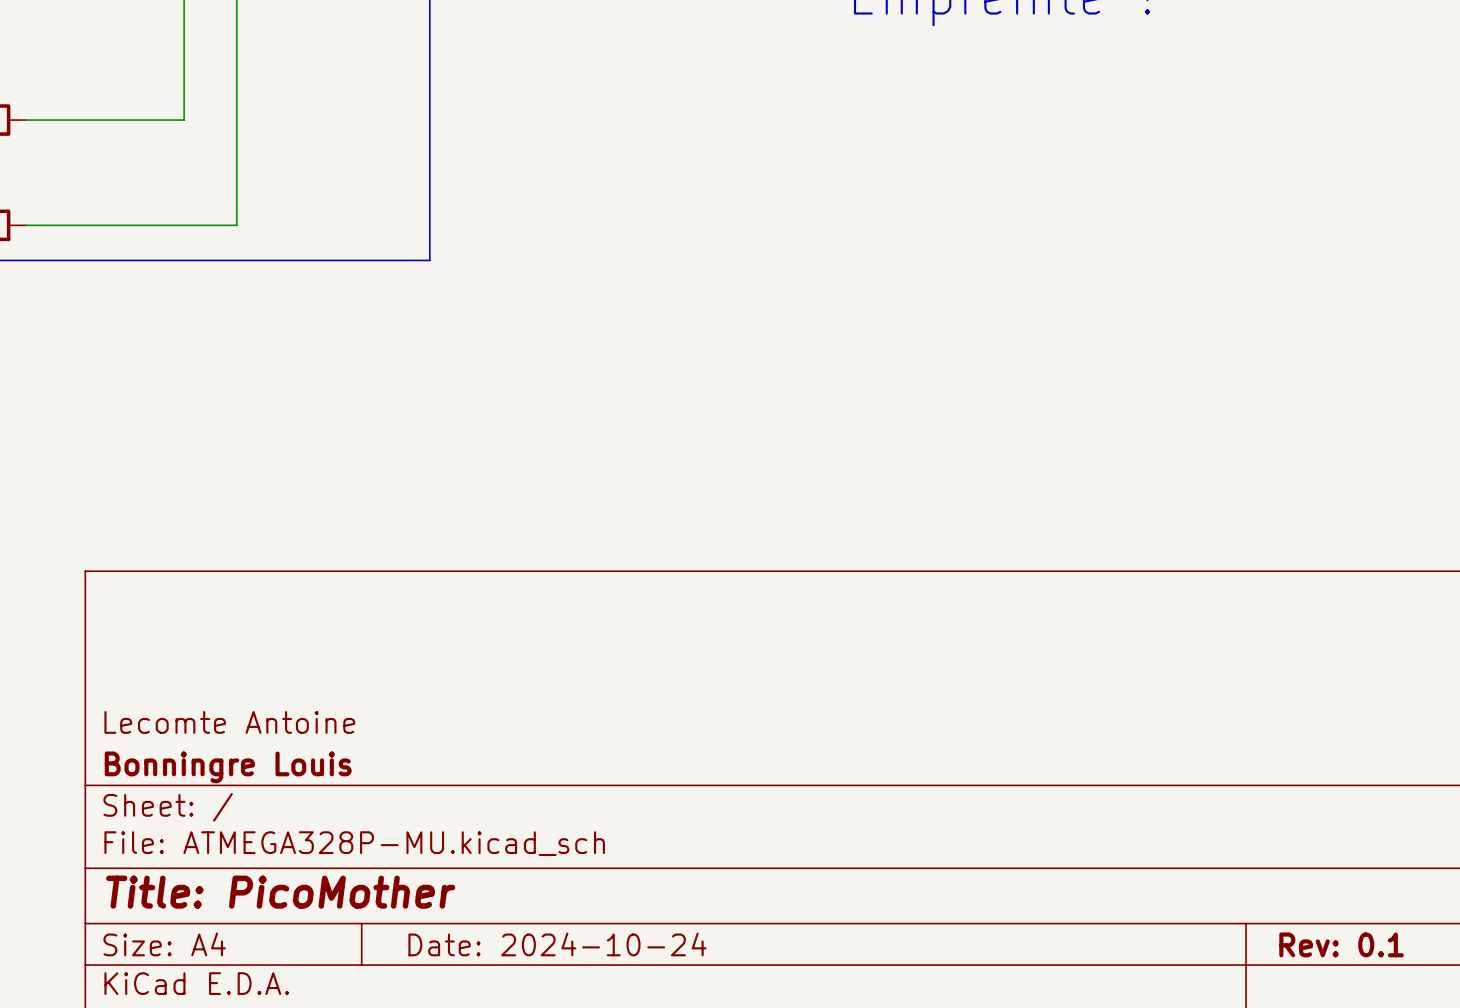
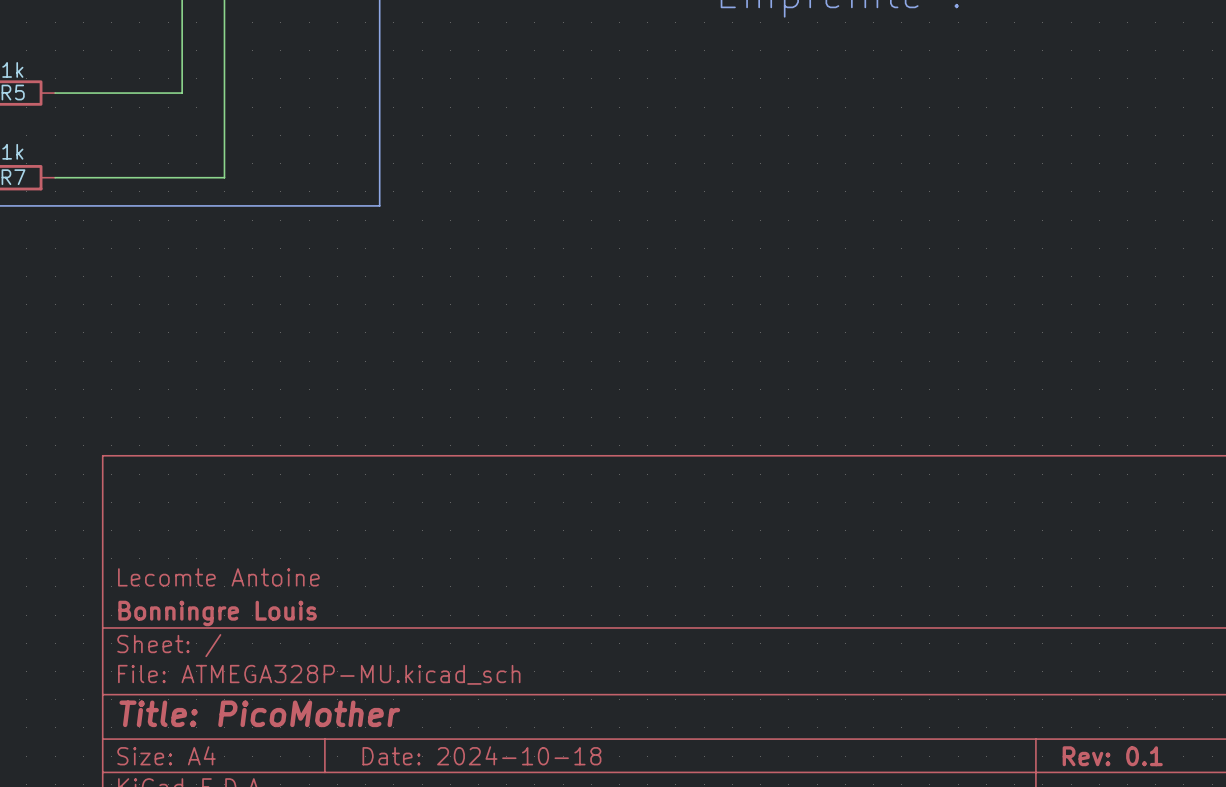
title block: Date: 2024-10-24 (557, 944) -> Date: 2024-10-18 (481, 755)

